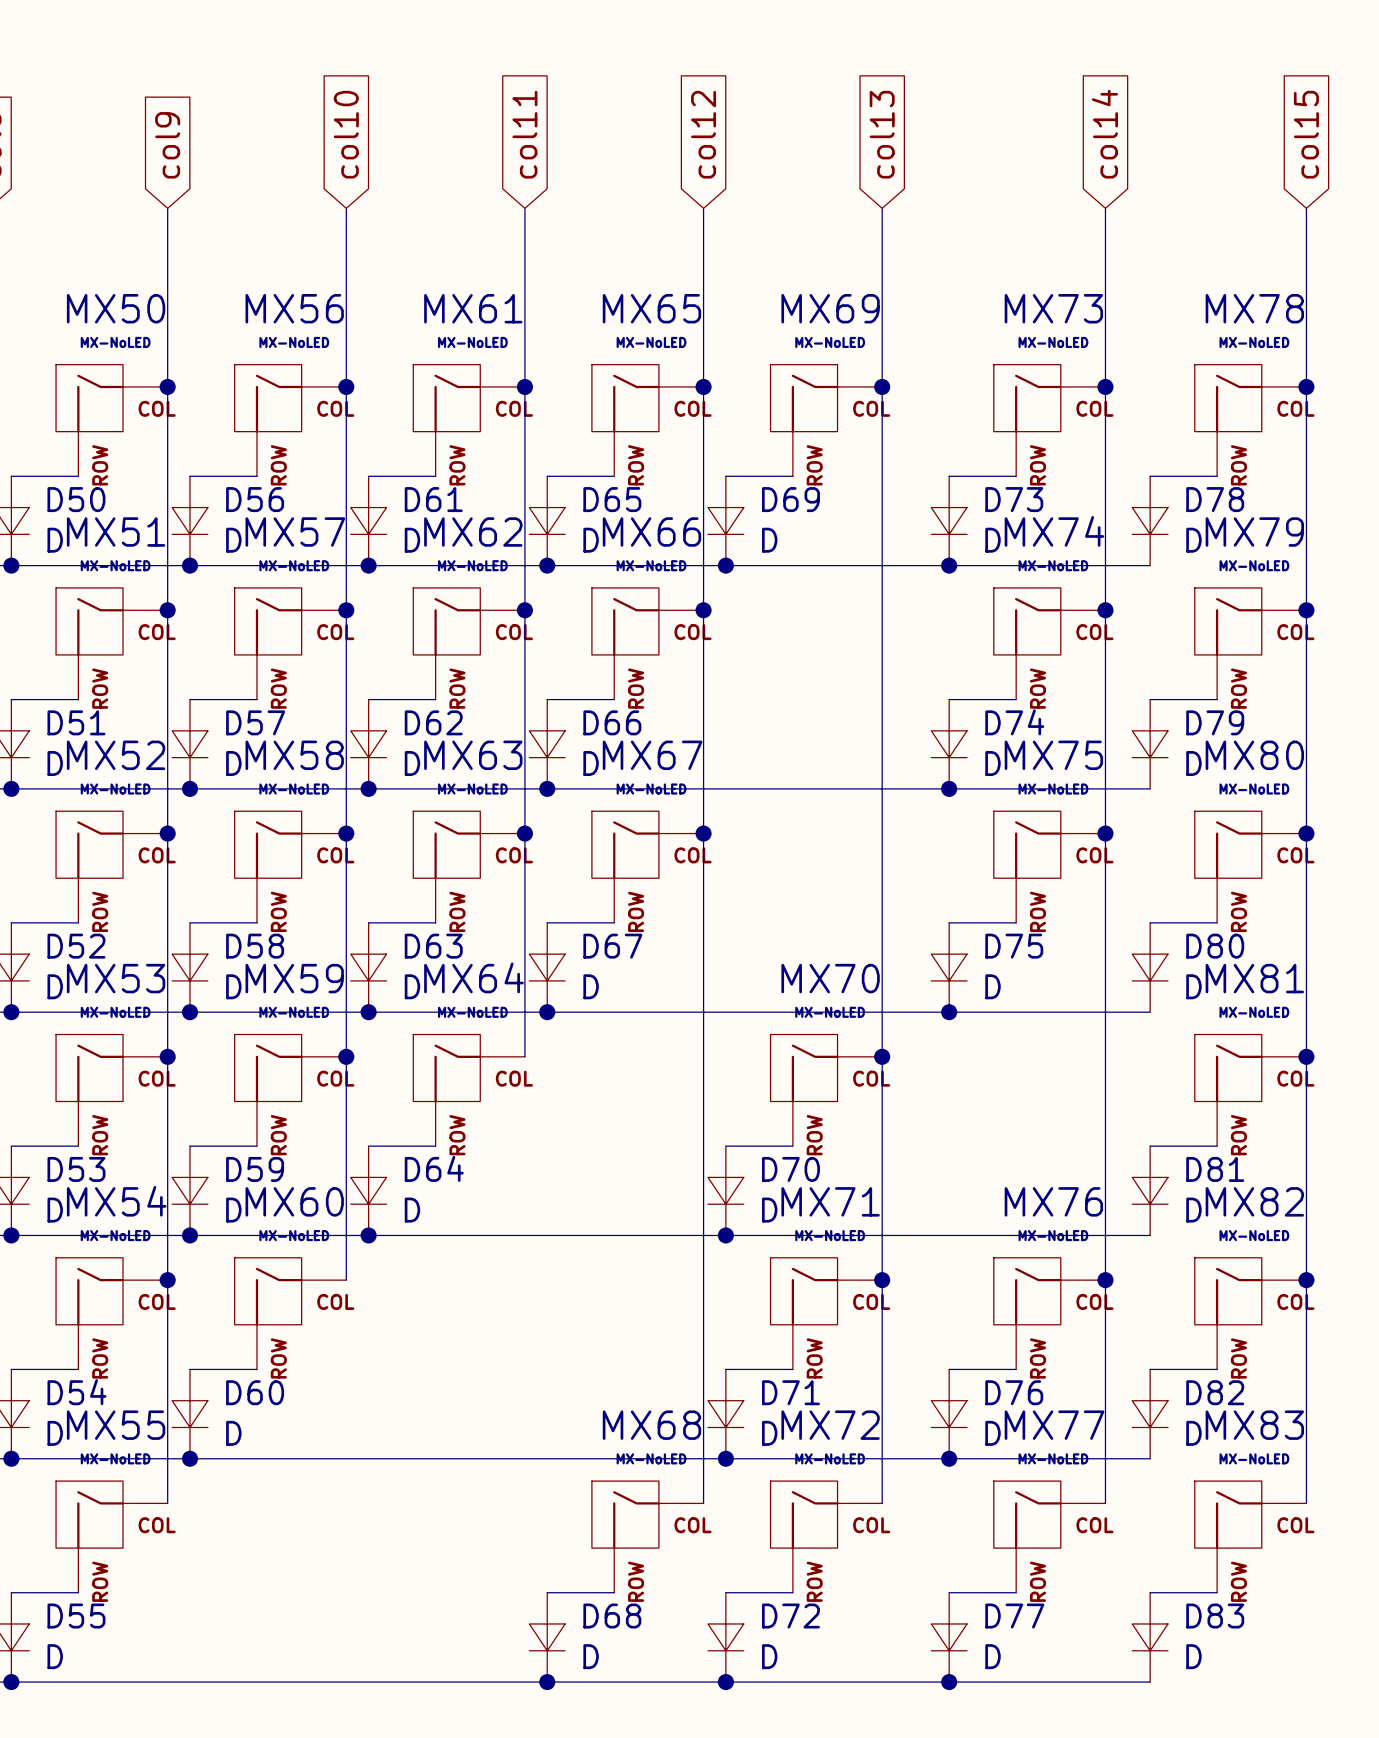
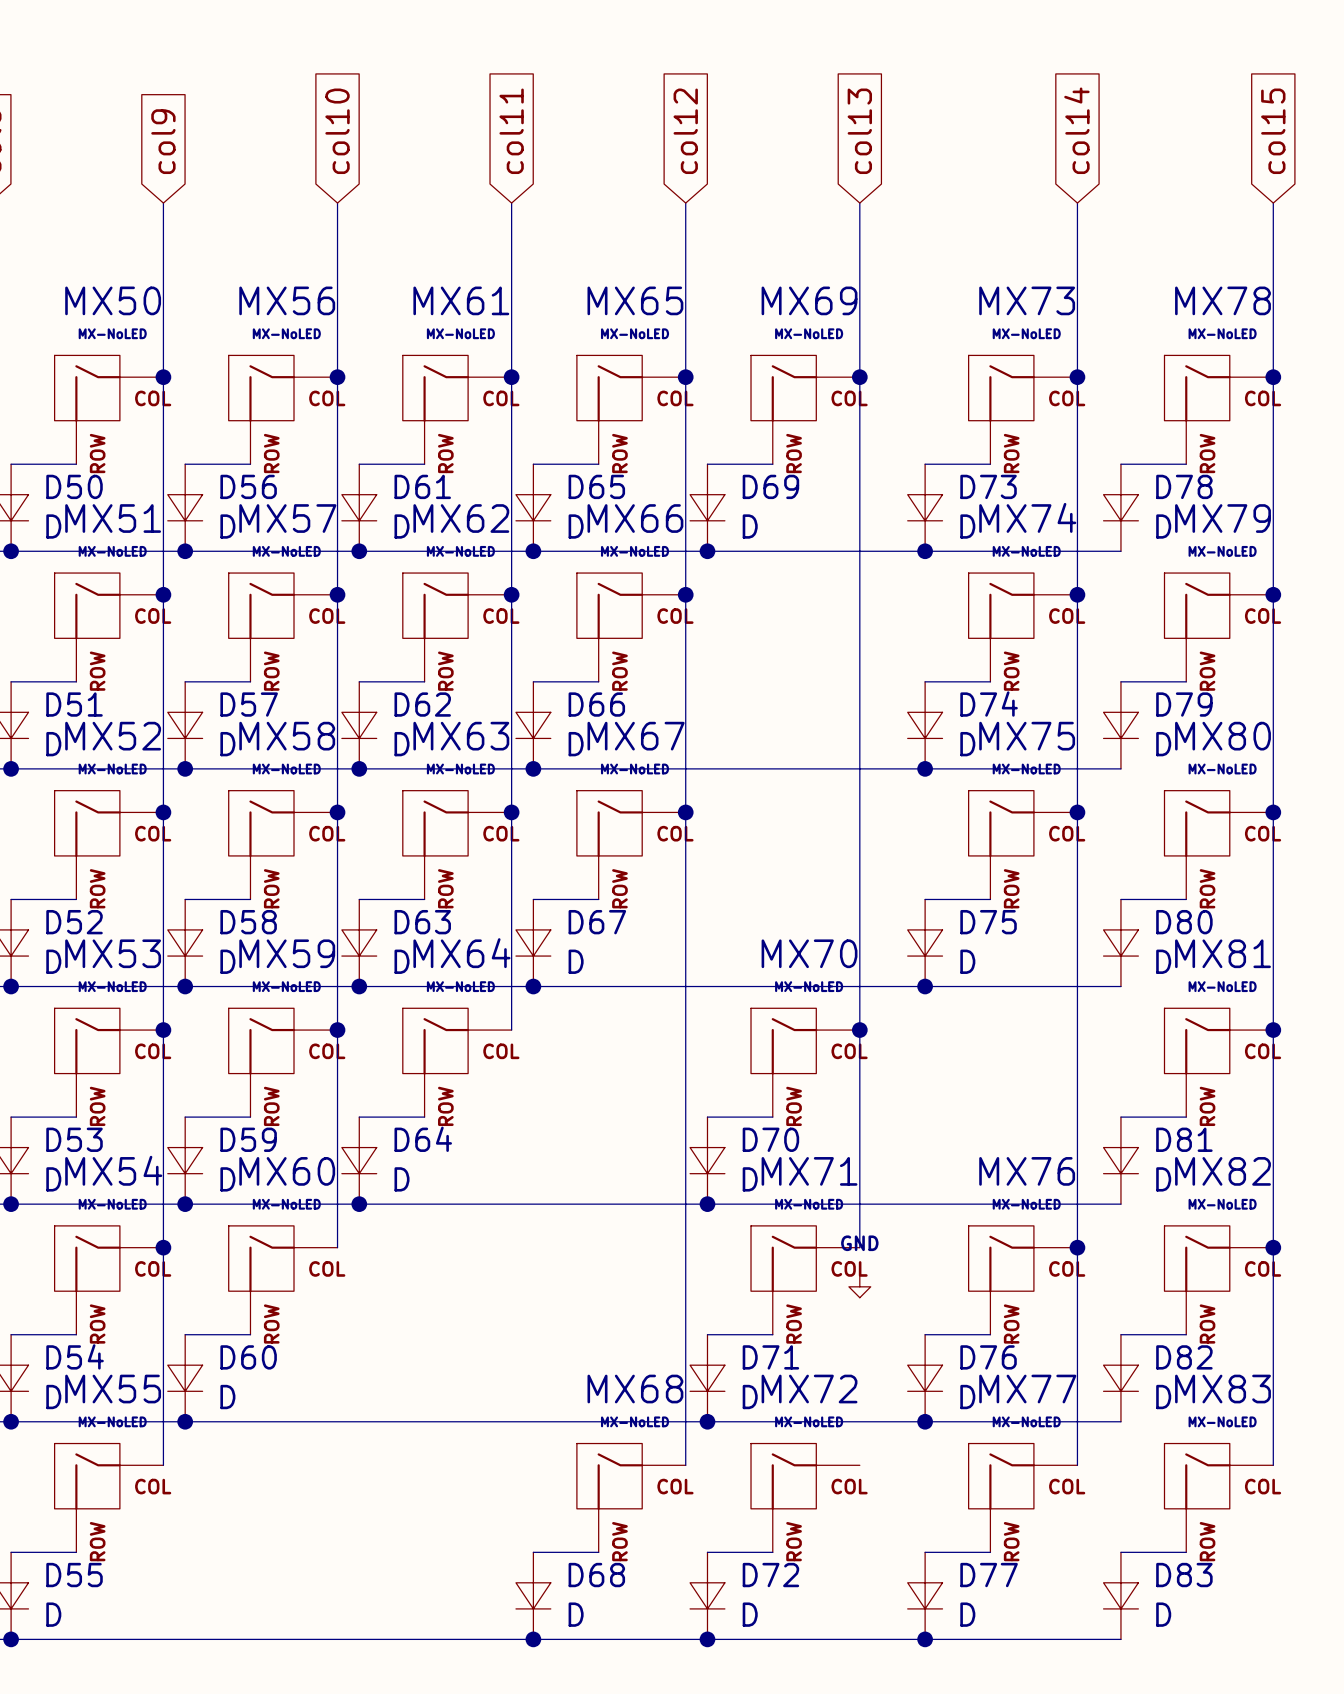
wire: (882, 1280) (882, 1503) -> none
junction: (882, 1280) -> none
power symbol: none -> GND (859, 1283)

